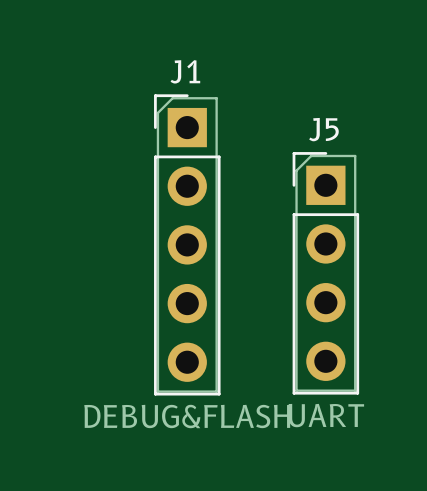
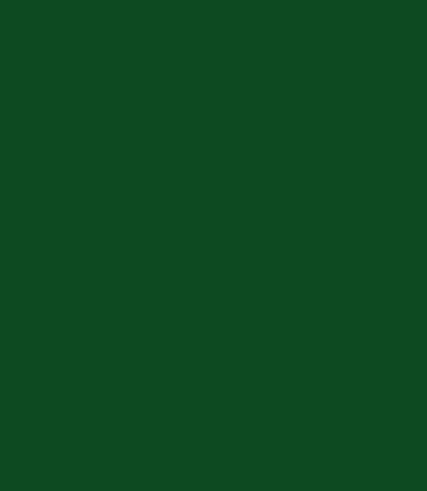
J1: DEBUG&FLASH (187, 244) -> none
J5: UART (325, 273) -> none

